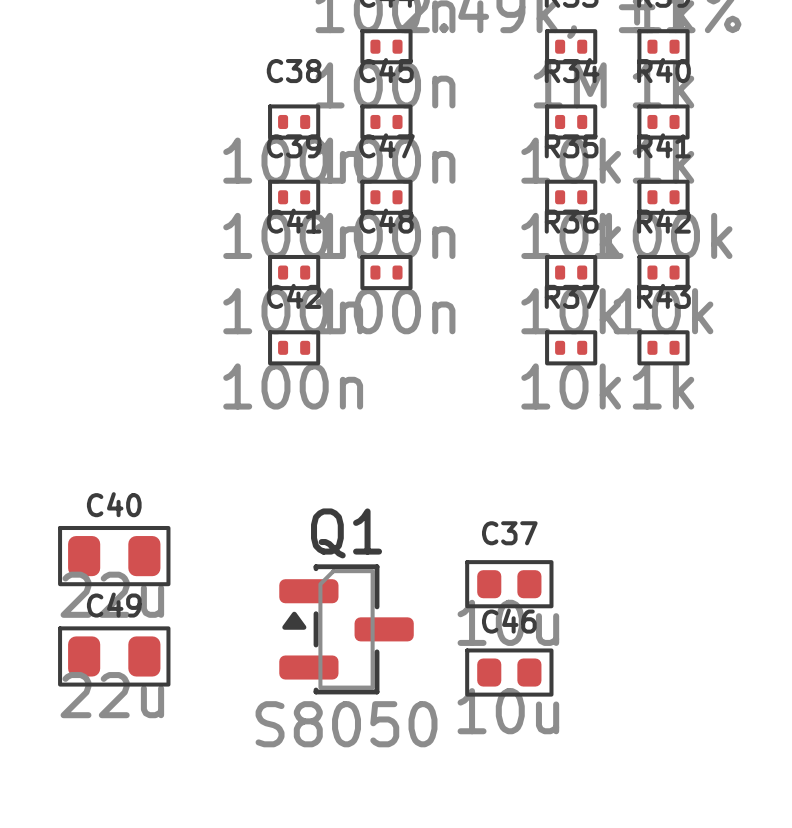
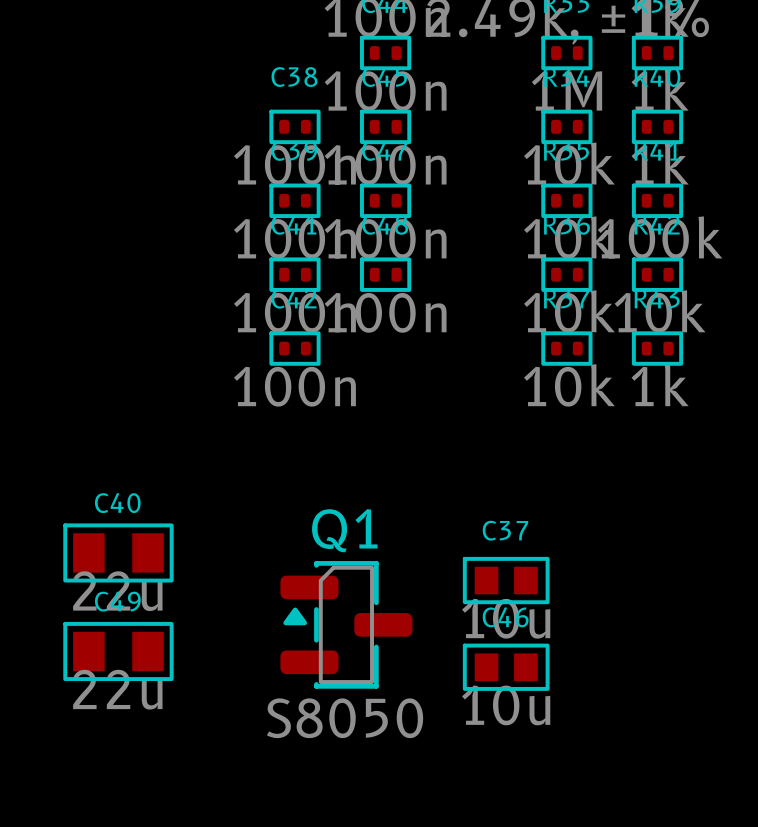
C40 footprint: [58, 525, 171, 587] -> [63, 523, 174, 583]
C37 footprint: [465, 560, 554, 609] -> [462, 556, 550, 605]
C49 footprint: [58, 626, 171, 687] -> [63, 621, 174, 682]
C46 footprint: [465, 648, 554, 697] -> [462, 643, 550, 691]

